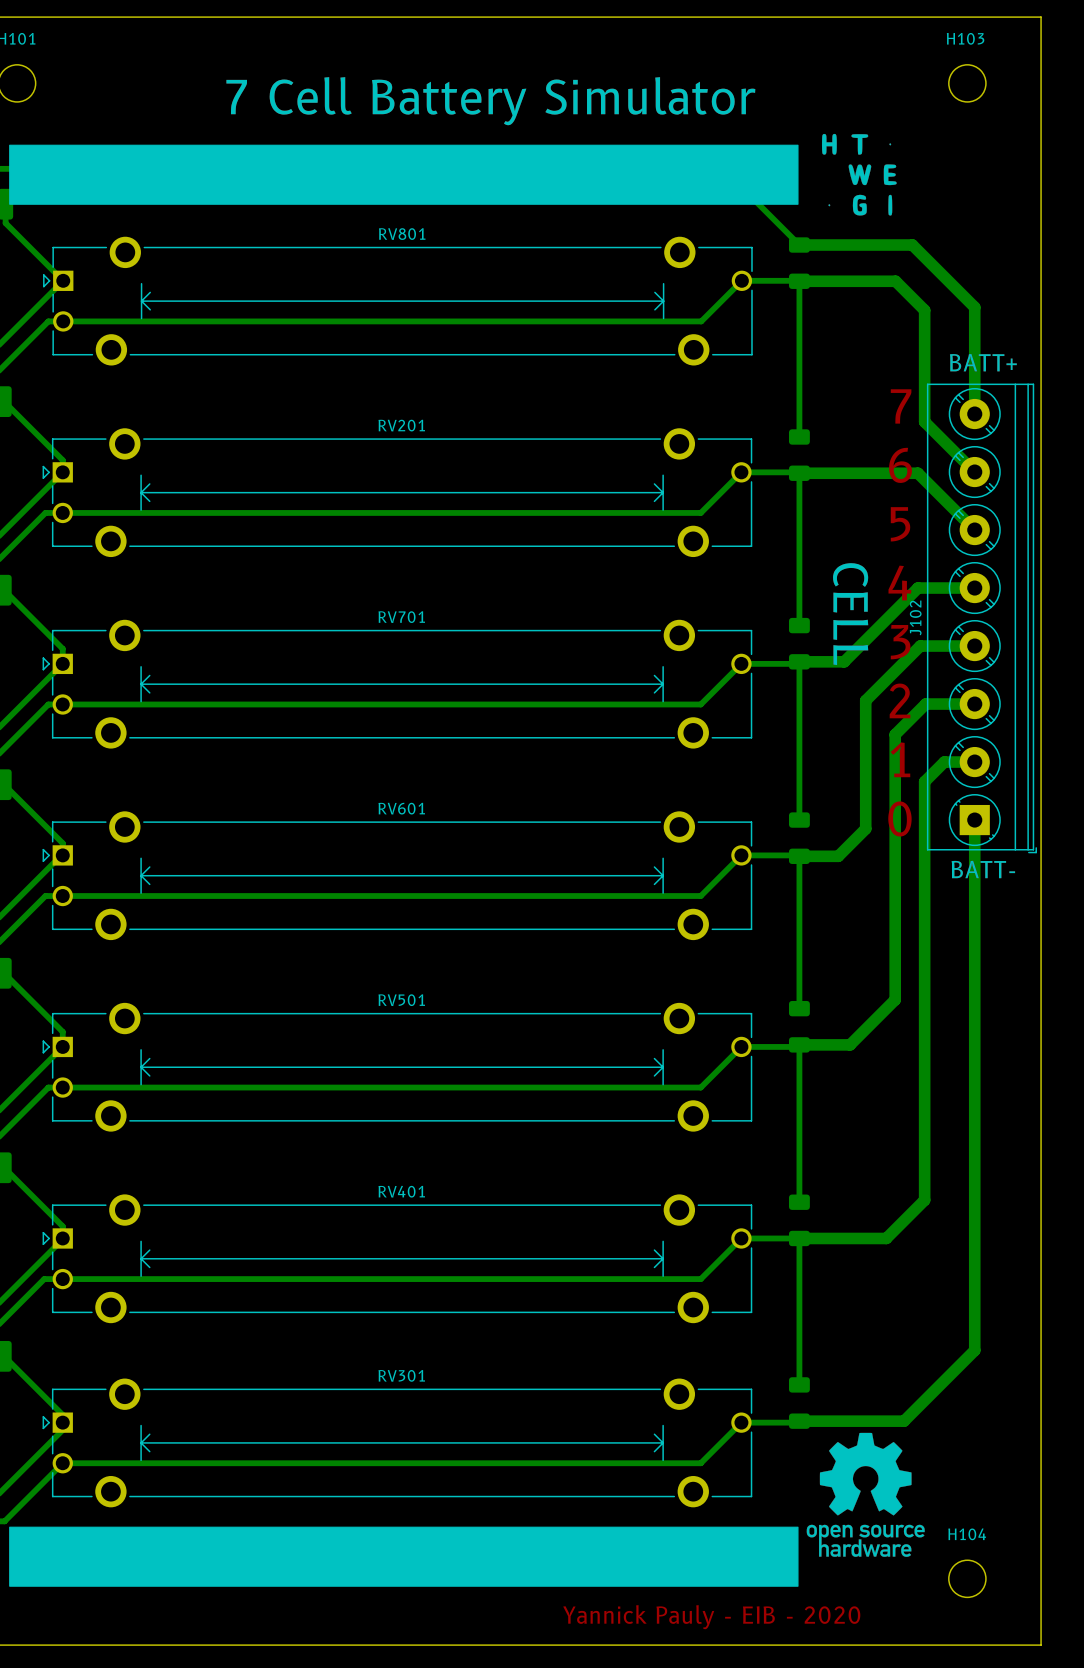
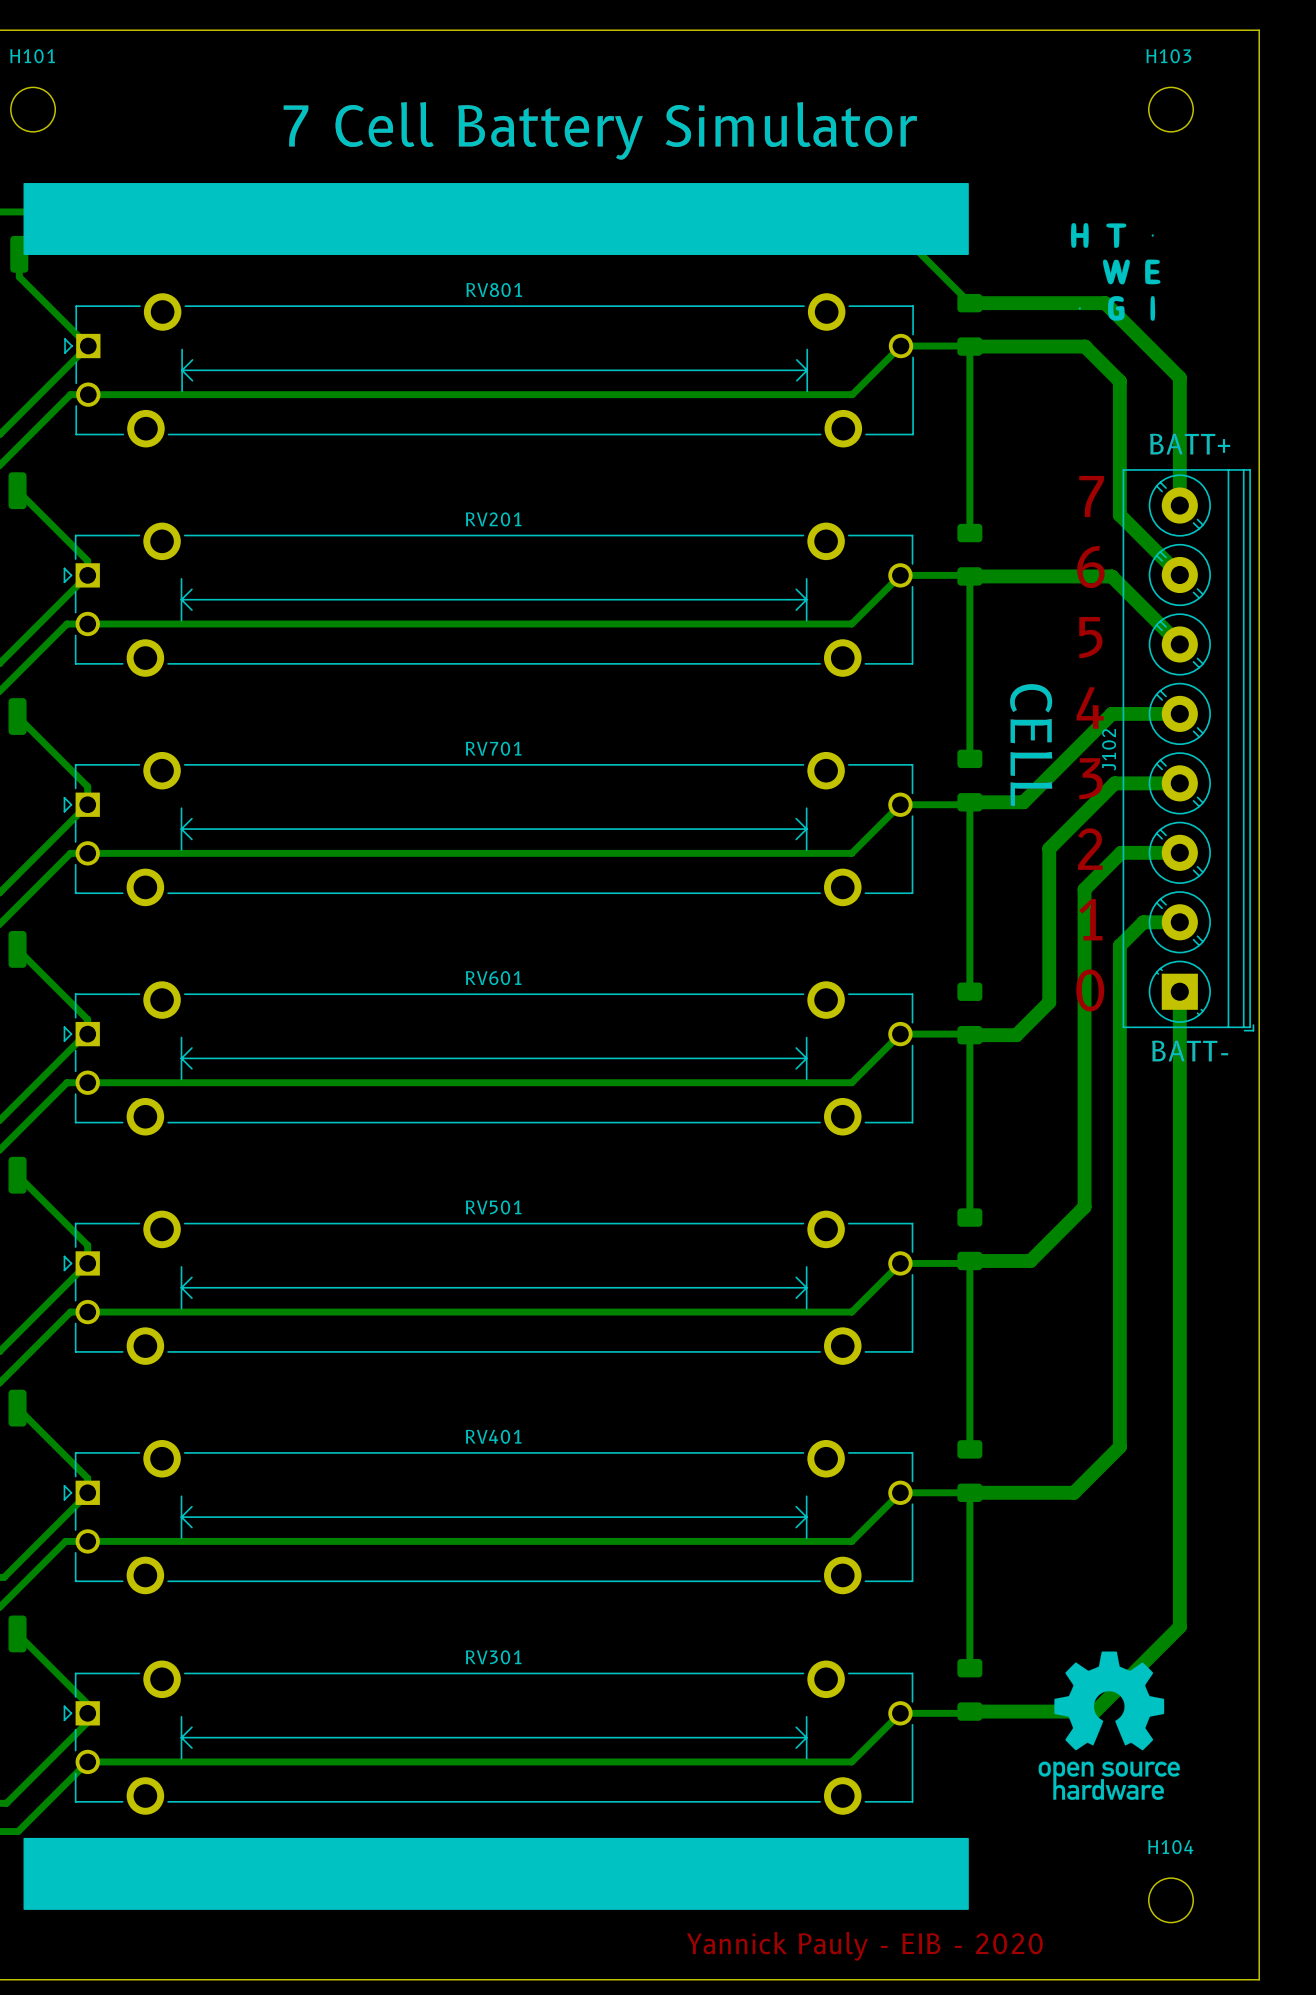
drawing position: (859, 174) -> (1115, 271)
drawing position: (865, 1494) -> (1109, 1725)

